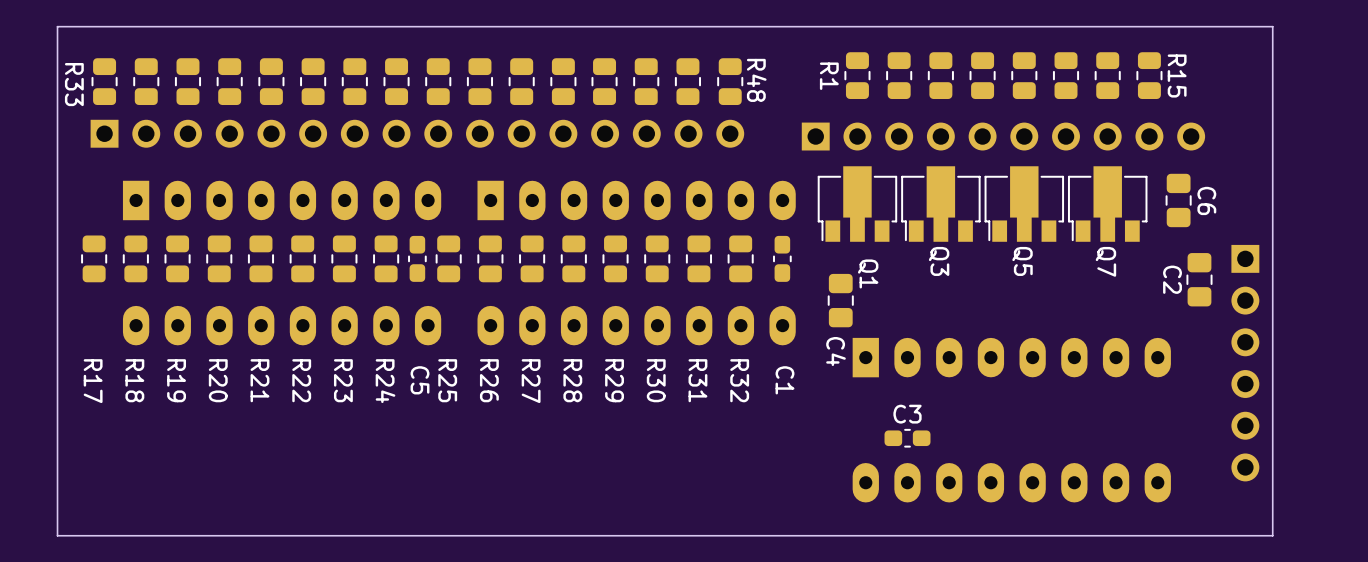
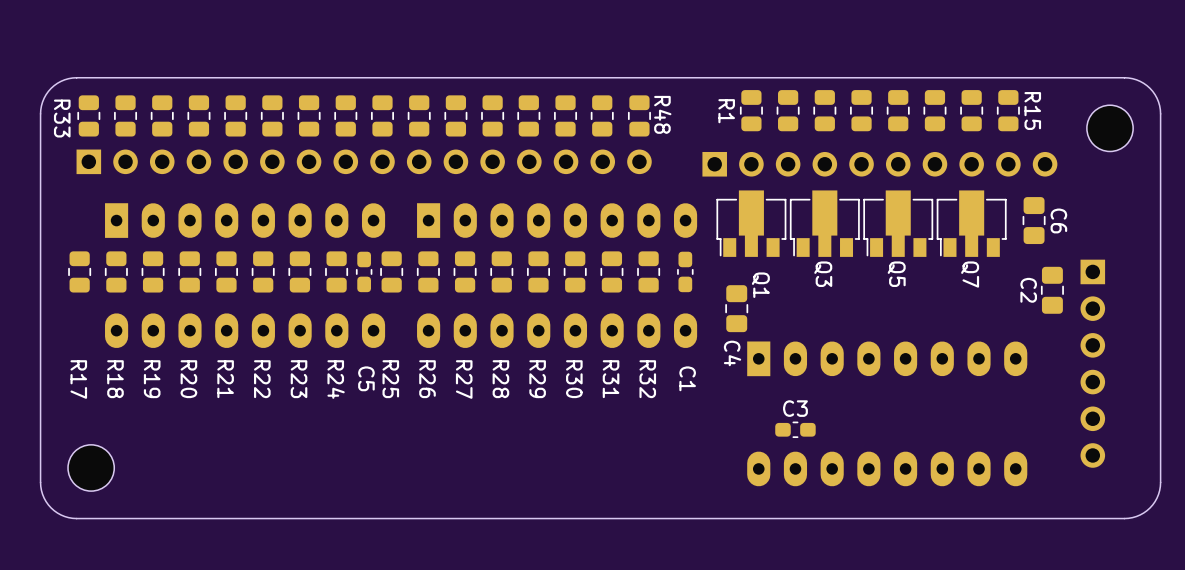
board edge: (1272, 26) (57, 26) (57, 535) (1272, 535) (1272, 26) -> (1124, 77) (1136, 79) (1150, 88) (1158, 101) (1160, 113) (1160, 486) (1152, 504) (1136, 516) (1124, 518) (76, 518) (64, 516) (54, 510) (42, 494) (40, 482) (40, 113) (42, 101) (48, 91) (64, 79) (76, 77) (1124, 77)
part: none -> (1110, 128)
part: none -> (91, 467)

